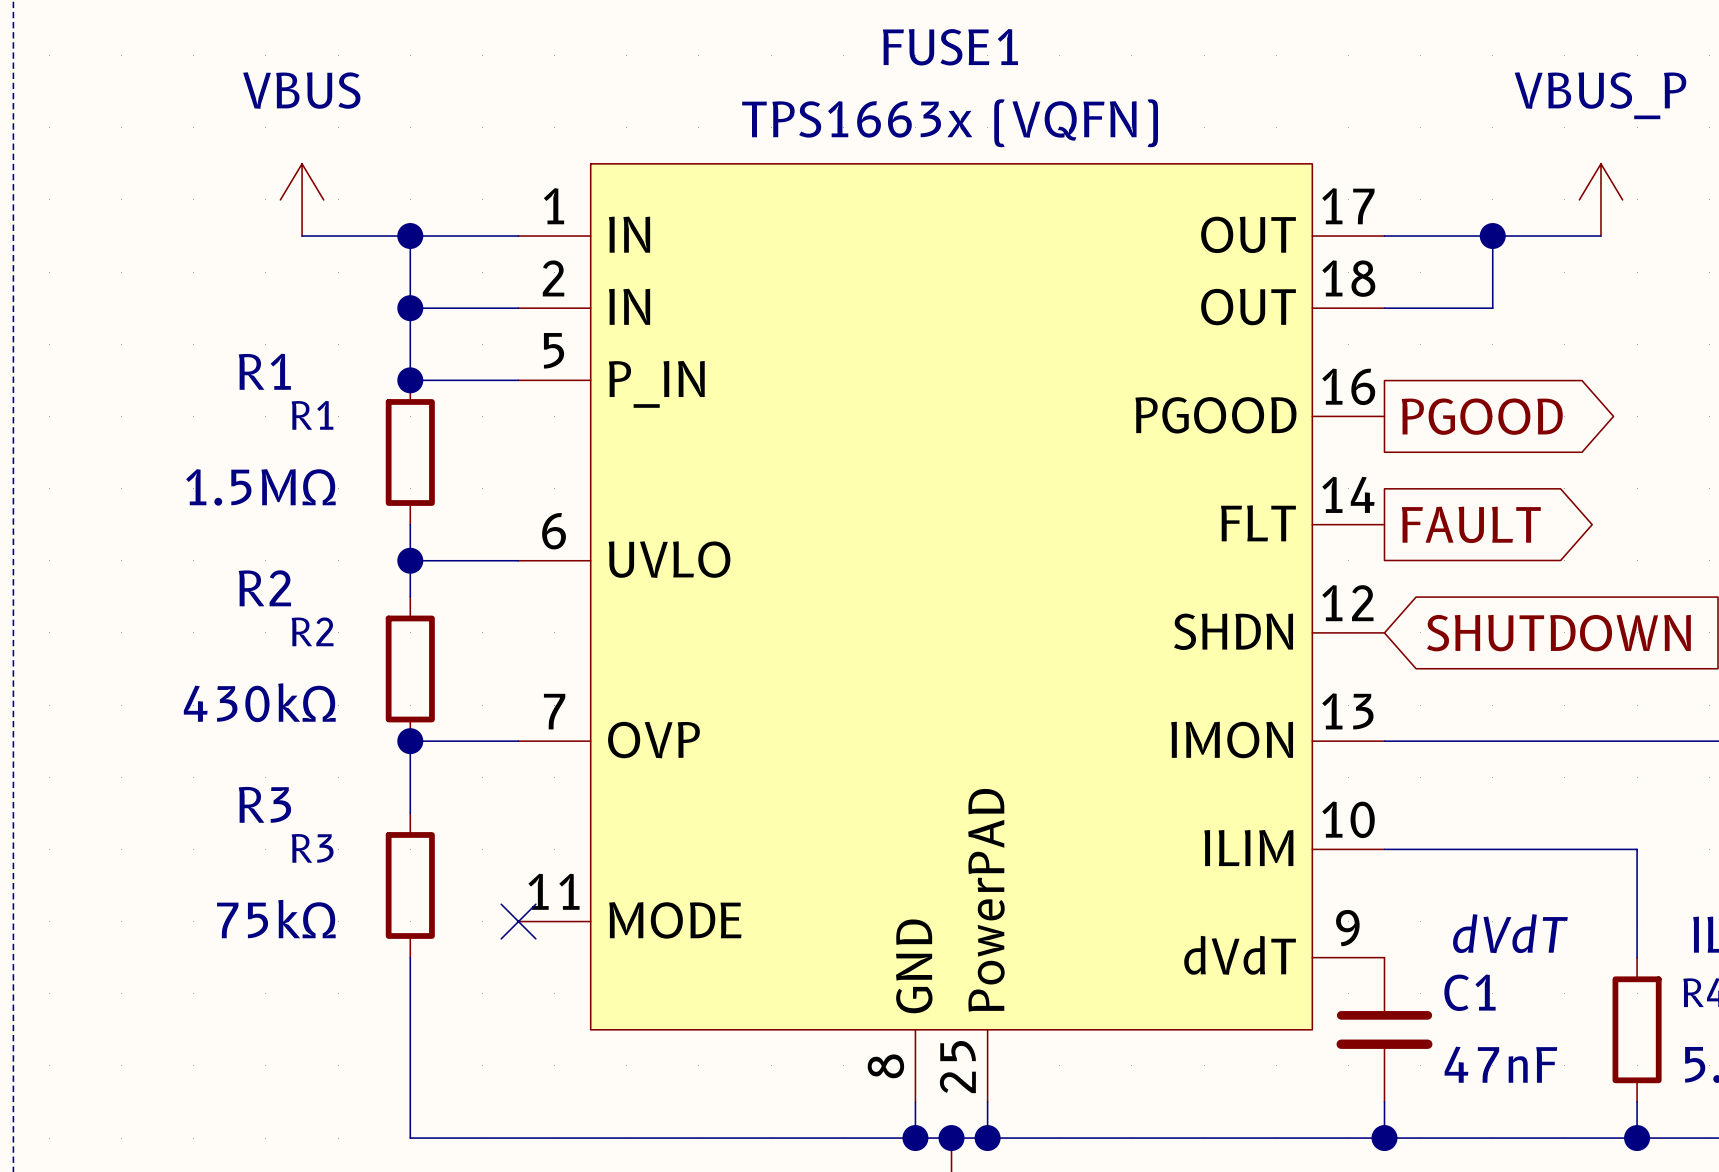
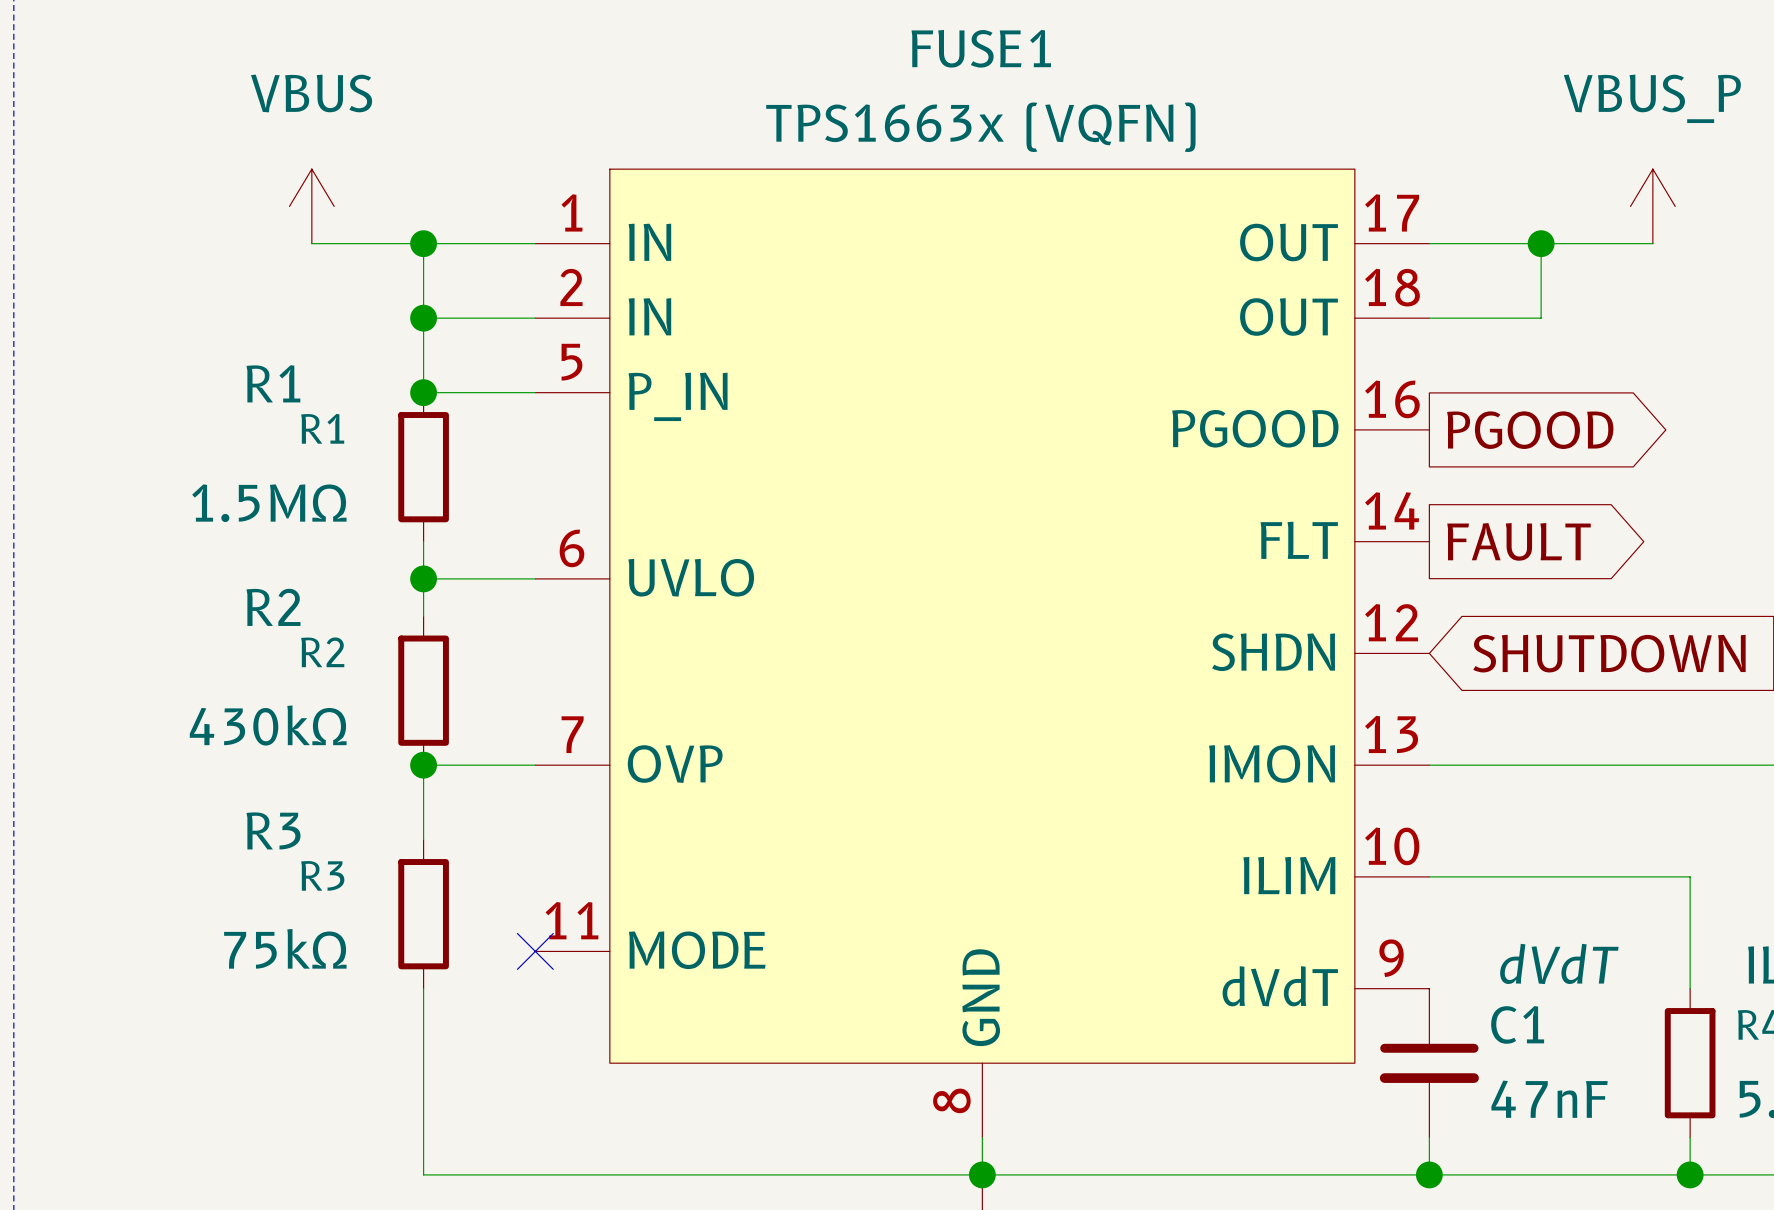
FUSE1 symbol: [518, 163, 1385, 1102] -> [535, 169, 1430, 1138]
wire: (915, 1101) (915, 1138) -> (982, 1137) (982, 1174)
wire: (987, 1101) (987, 1138) -> none
junction: (915, 1138) -> none
junction: (987, 1138) -> none

